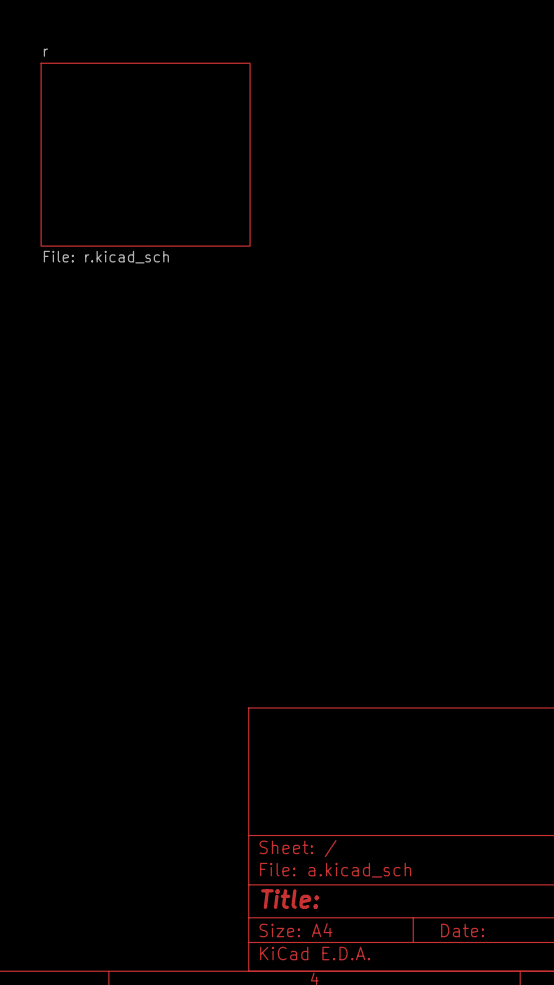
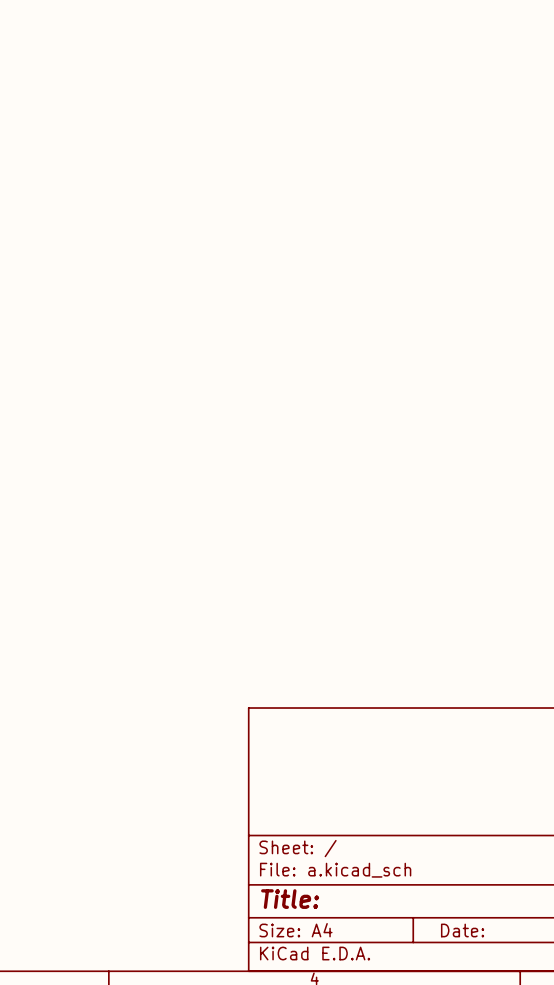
sheet r: File: r.kicad_sch (145, 154) -> none

